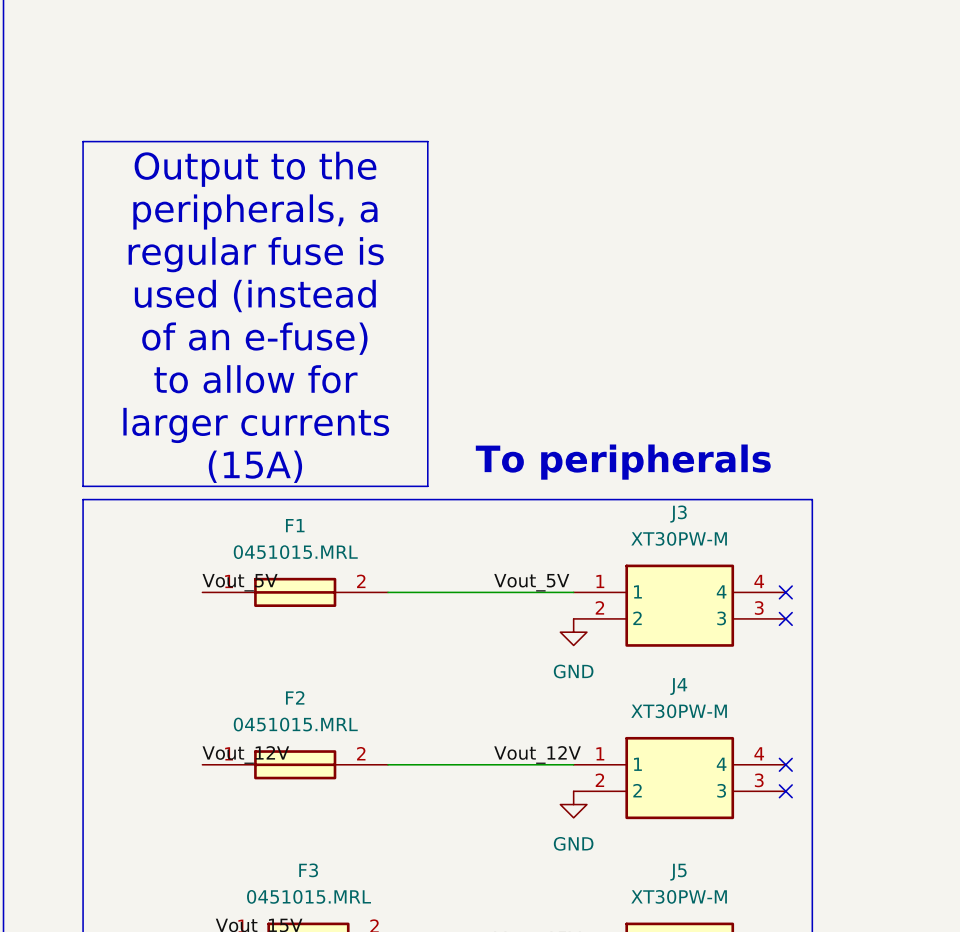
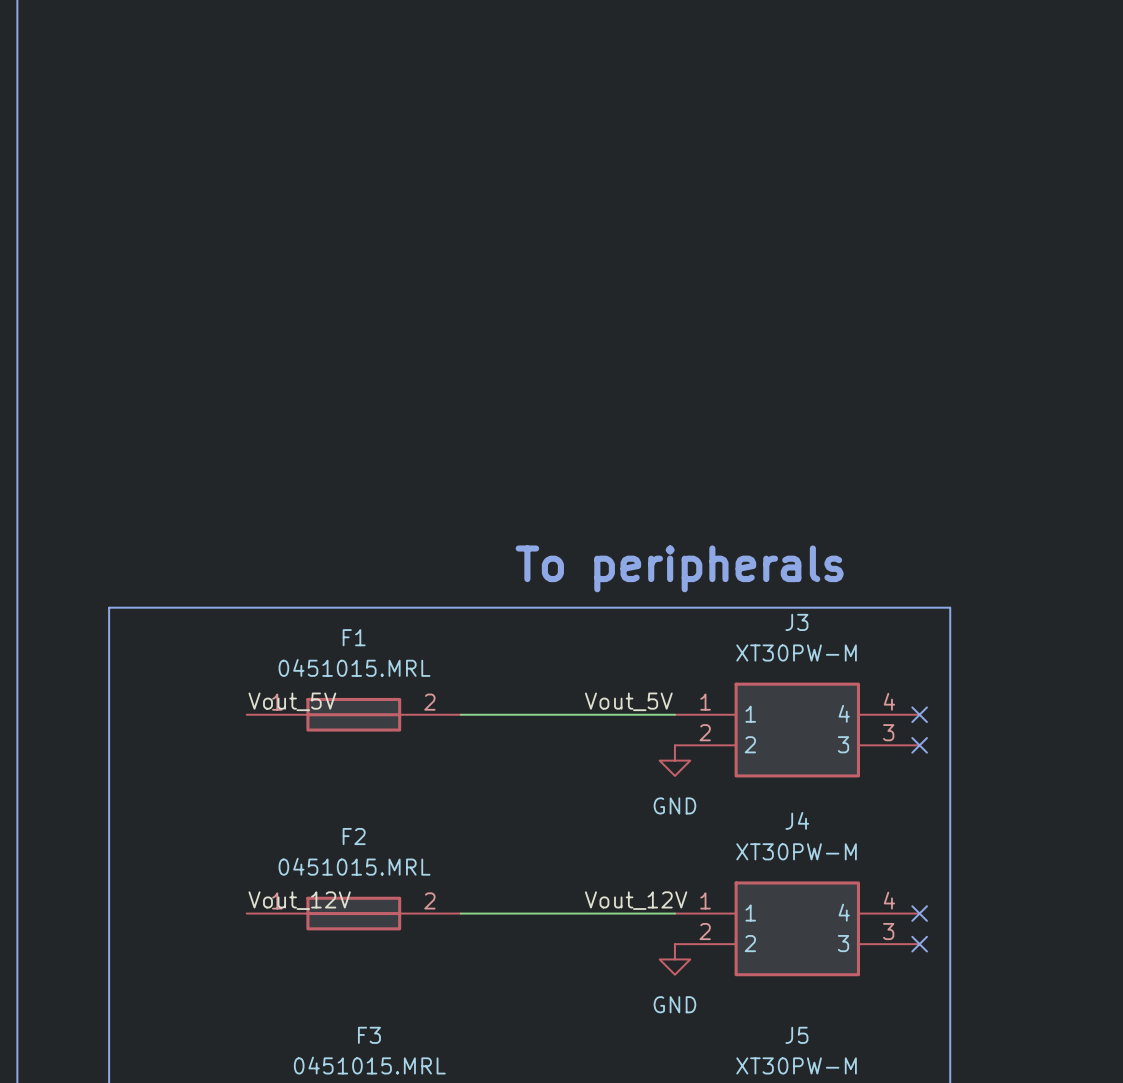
line: (83, 141) (427, 141) (427, 486) (83, 486) (83, 141) -> none
text: Output to the (255, 169) -> none
text: peripherals, a (255, 211) -> none
text: regular fuse is (256, 254) -> none
text: used (instead (255, 295) -> none
text: of an e-fuse) (254, 338) -> none
text: to allow for (255, 379) -> none
text: larger currents (256, 425) -> none
text position: To peripherals (623, 462) -> To peripherals (679, 568)
text: (15A) (255, 466) -> none

